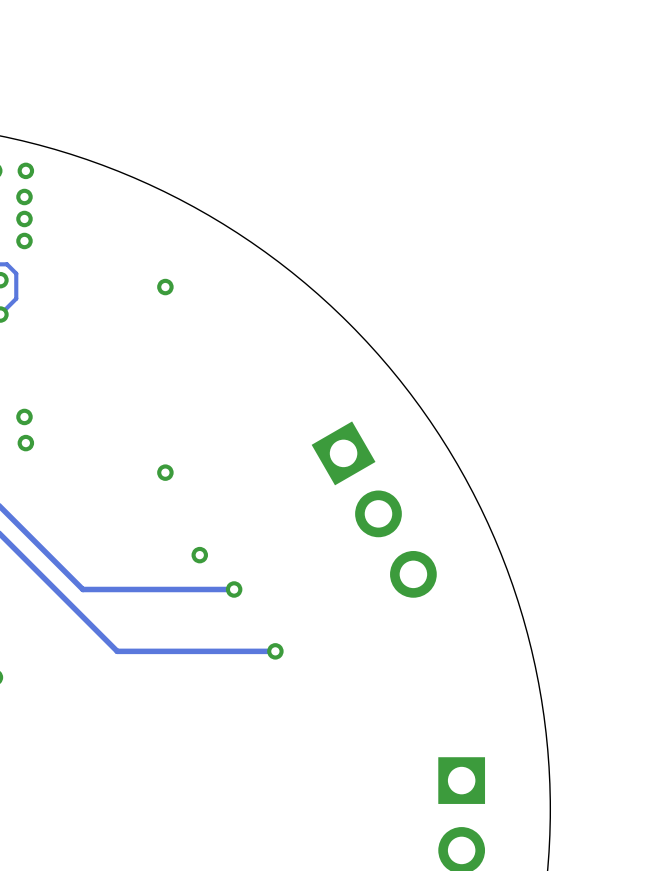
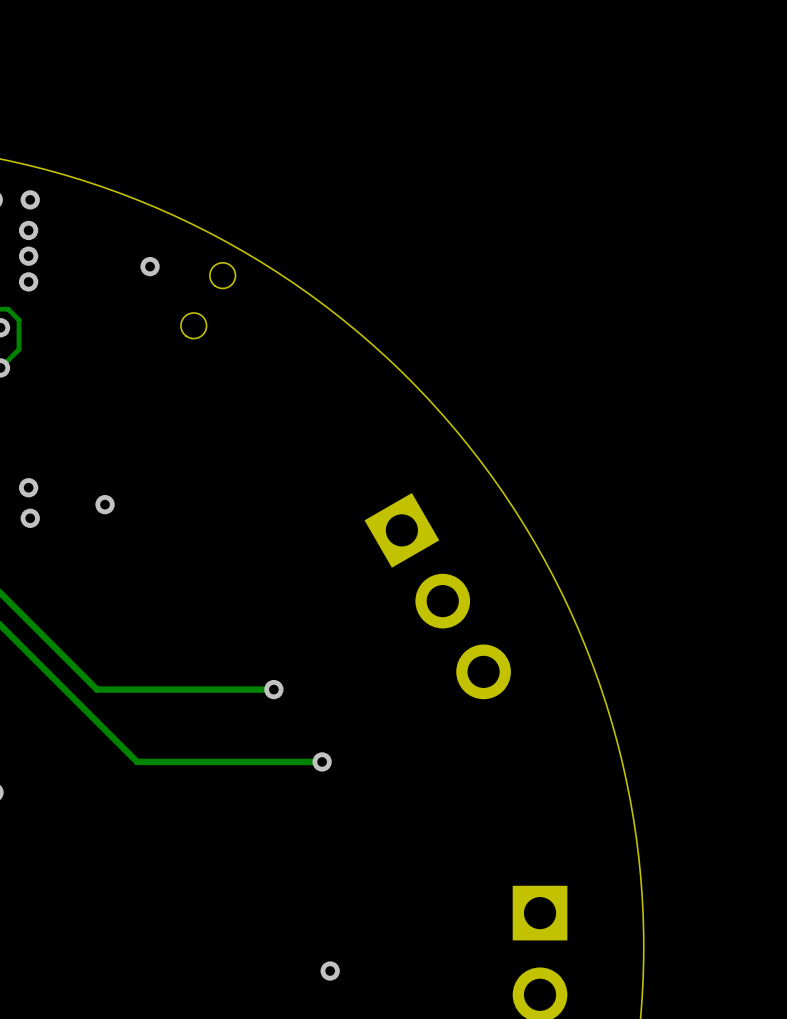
part: none -> (208, 300)
via position: (165, 287) -> (150, 266)
via: none -> (105, 504)
via: (165, 472) -> none
via: (199, 555) -> none
via: none -> (330, 971)

